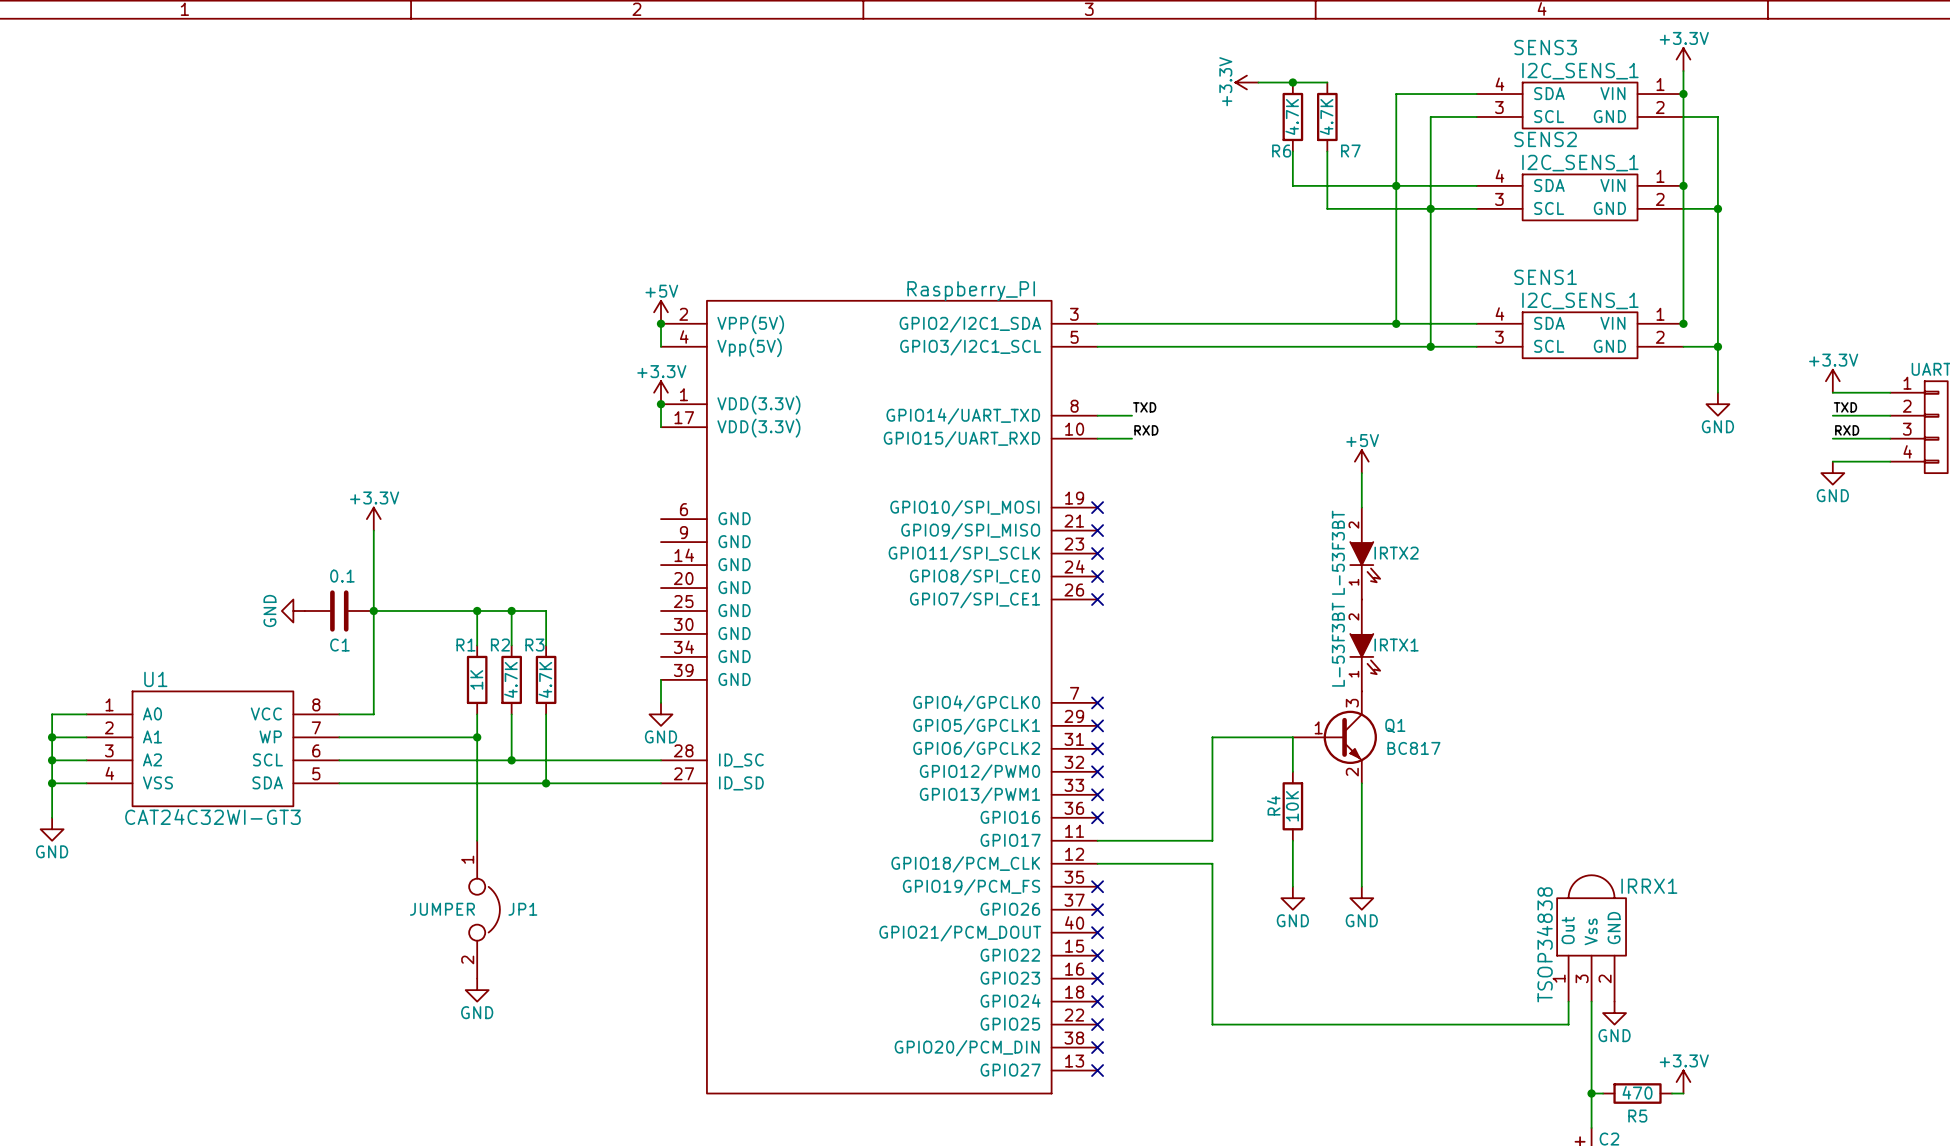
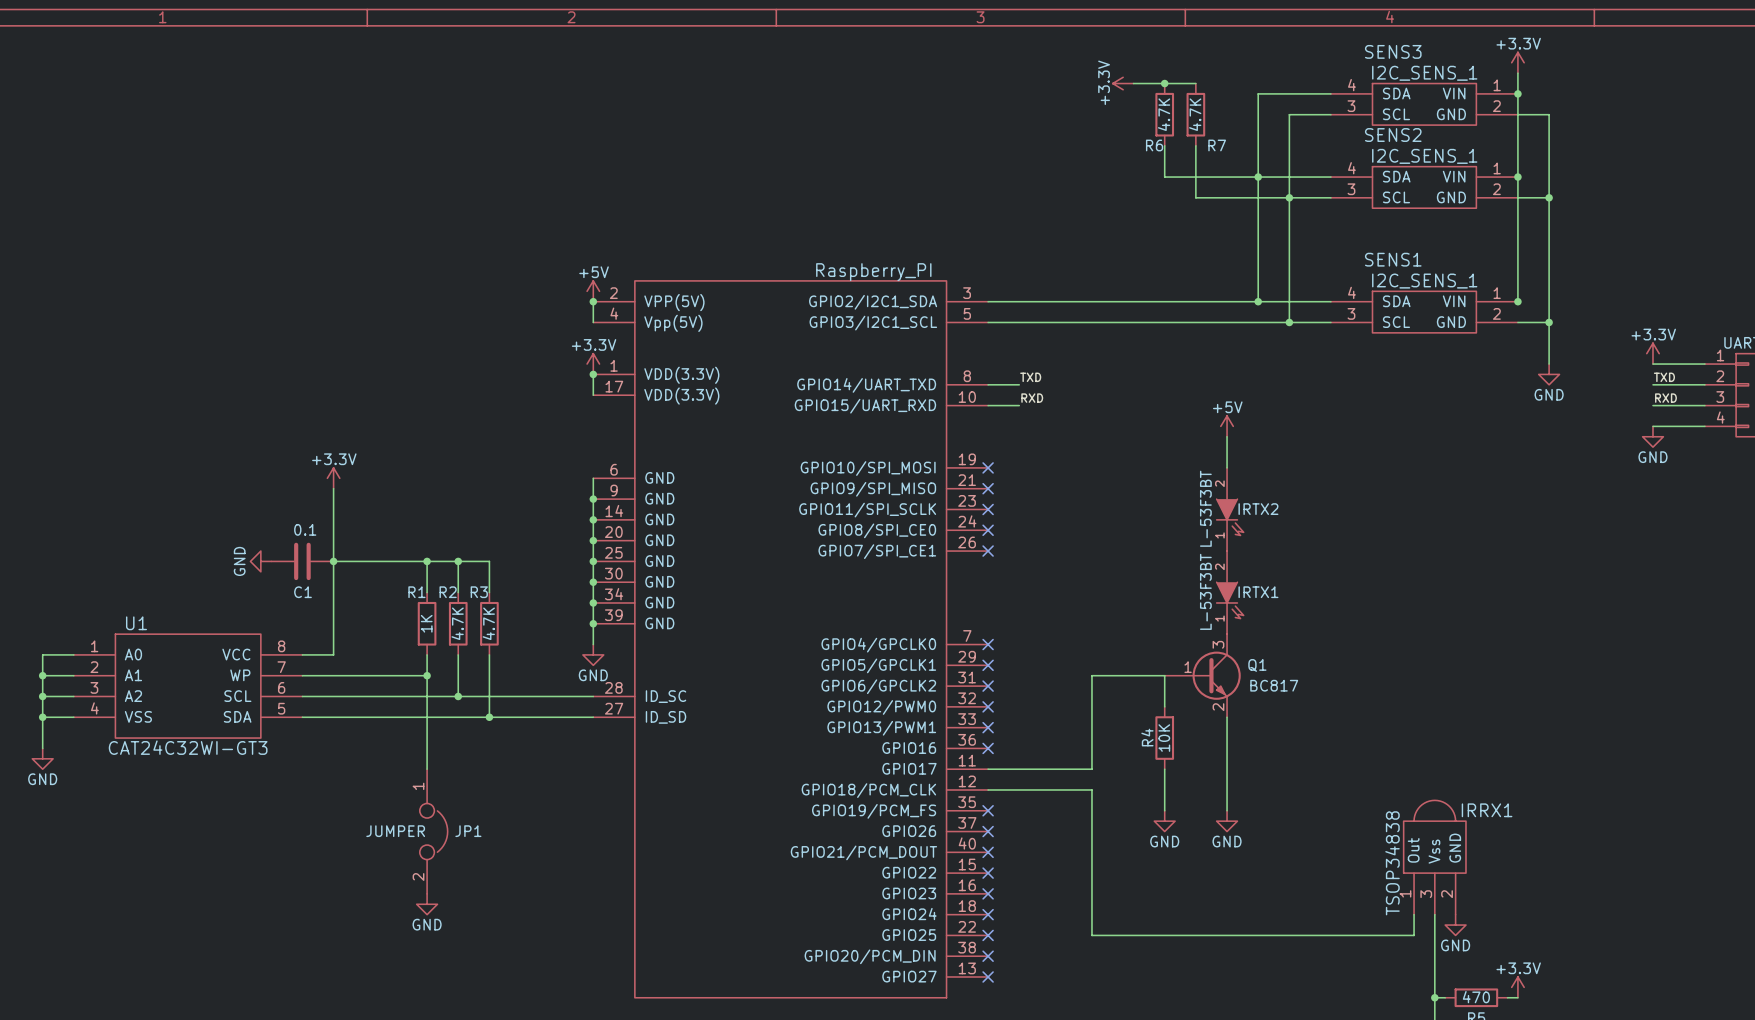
wire: none -> (593, 478) (593, 623)
junction: none -> (593, 499)
junction: none -> (593, 519)
junction: none -> (593, 540)
junction: none -> (593, 561)
junction: none -> (593, 582)
junction: none -> (593, 602)
junction: none -> (593, 623)

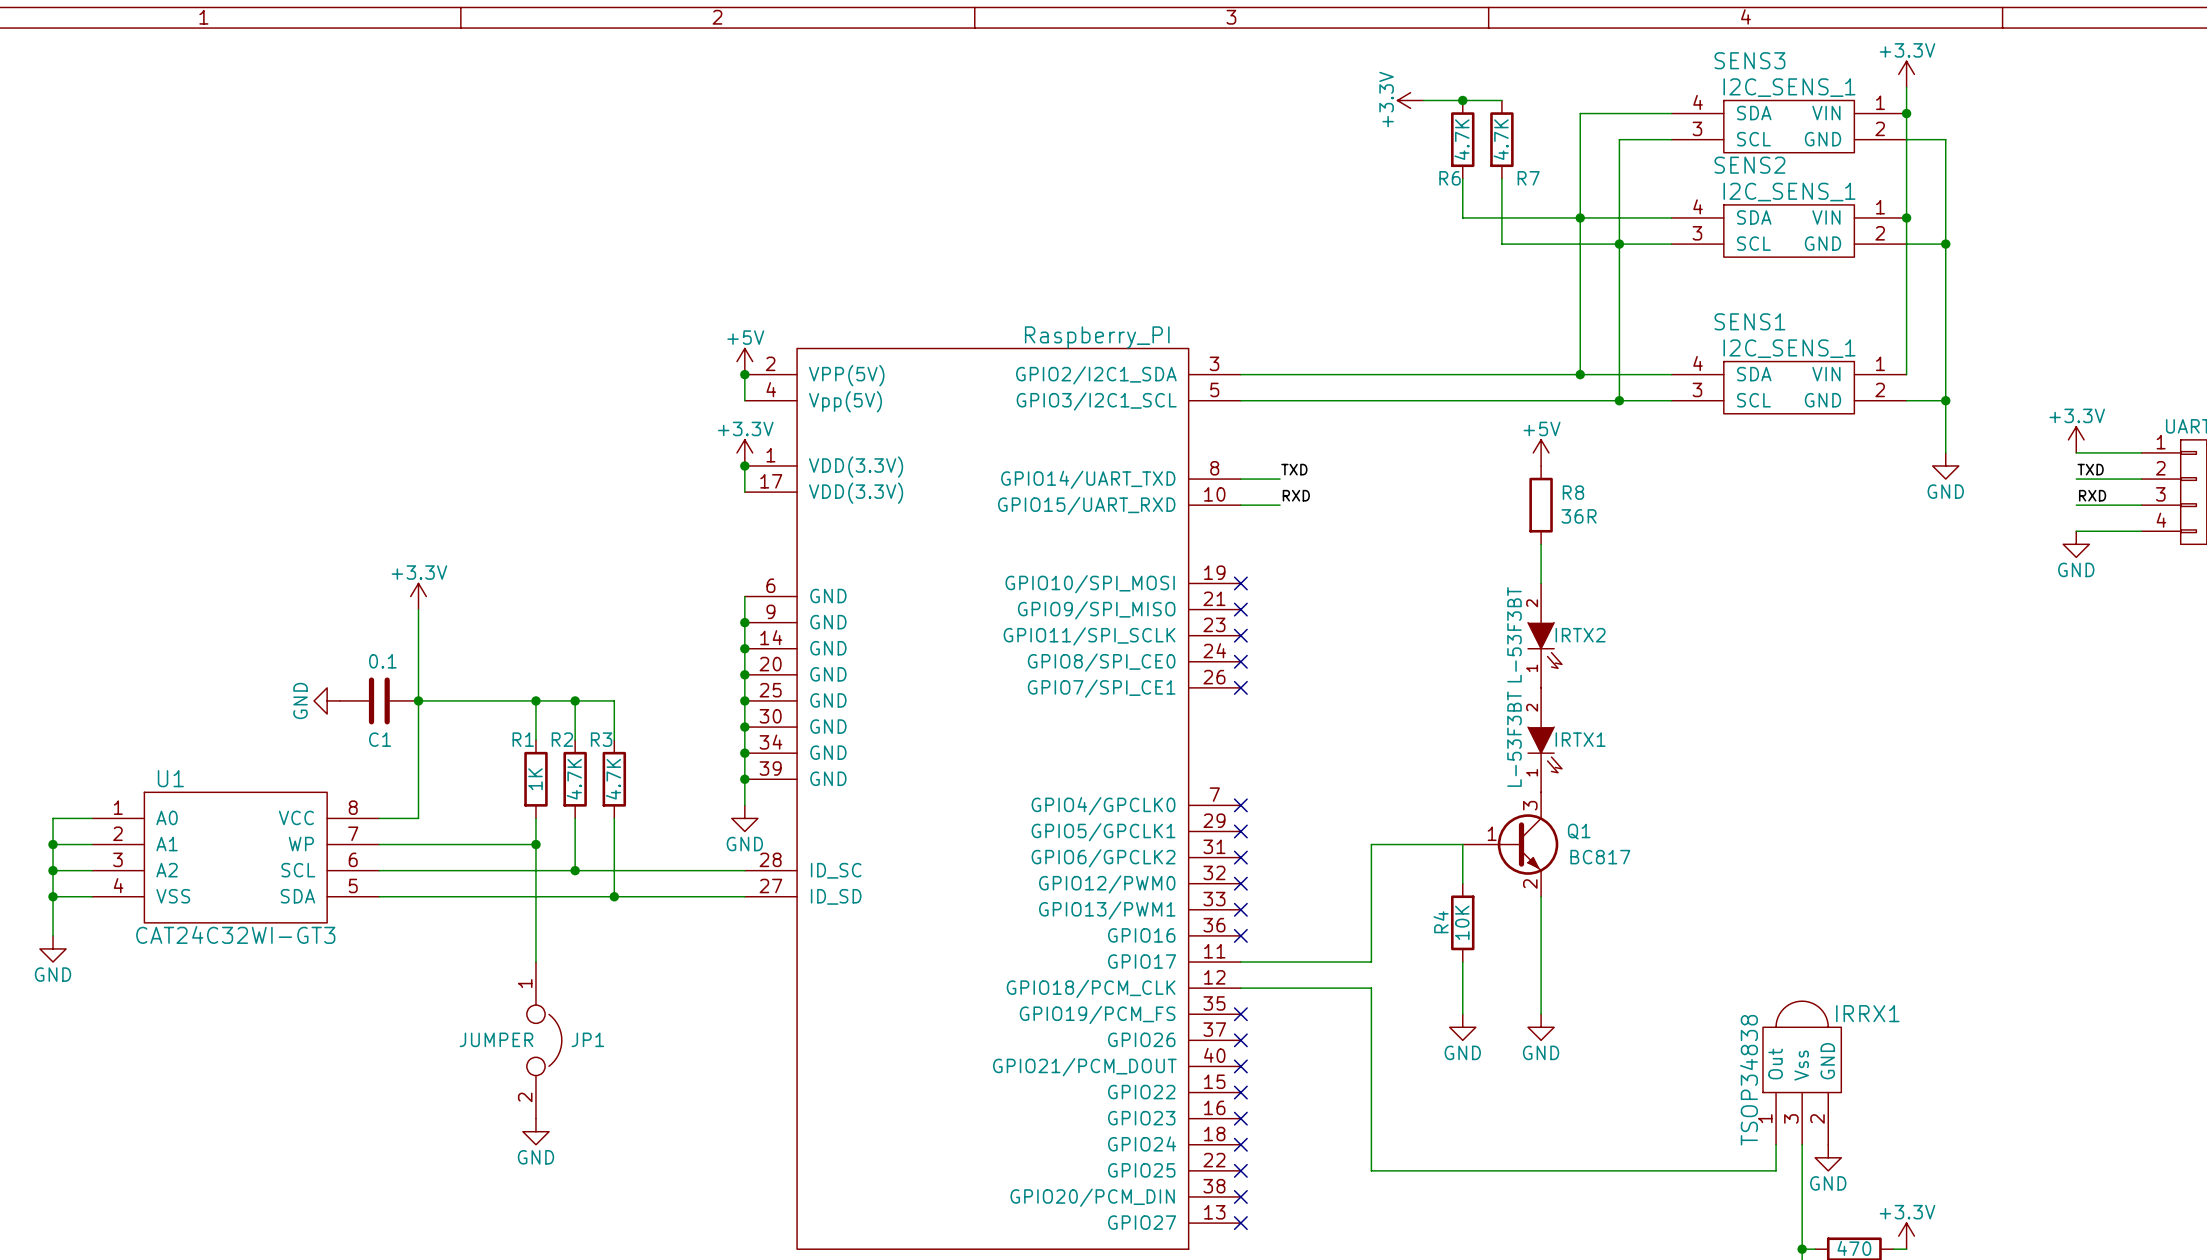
junction: (1517, 301) -> none
R8: none -> 36R (1541, 505)
power symbol position: +5V (1227, 426) -> +5V (1541, 452)

